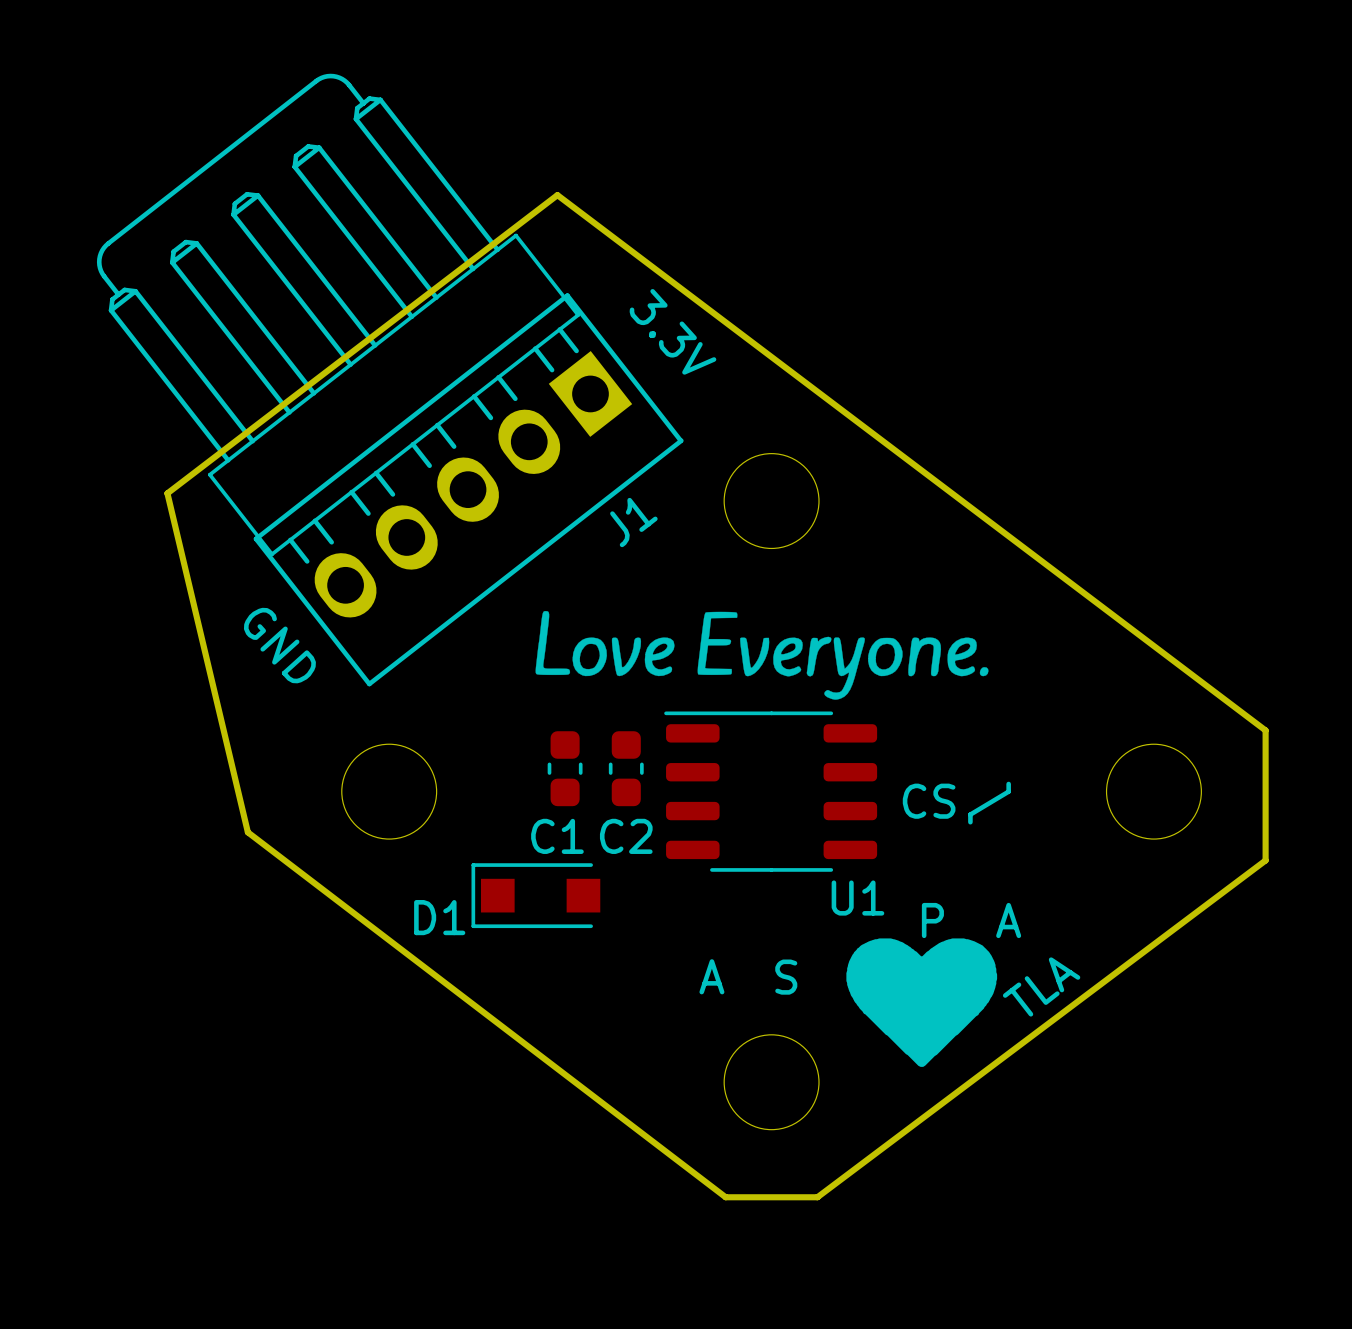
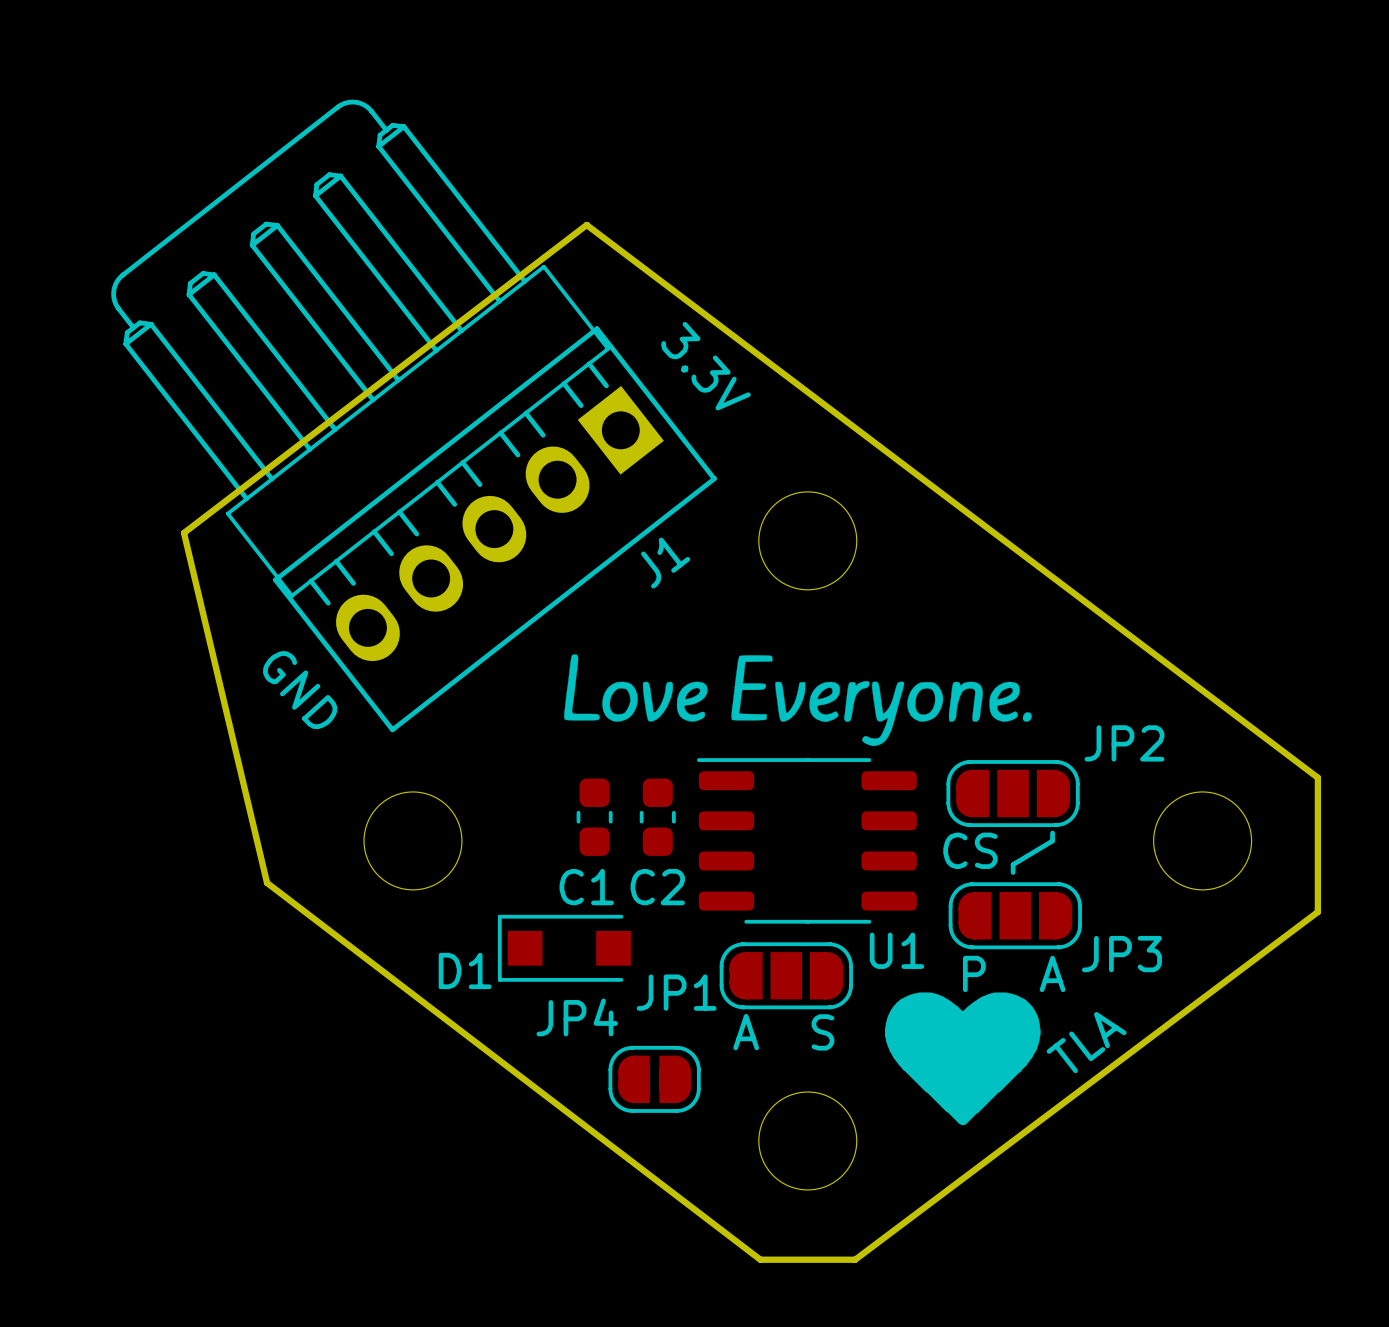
JP2: none -> (1013, 793)
JP3: none -> (1015, 915)
JP1: none -> (786, 975)
JP4: none -> (654, 1079)

